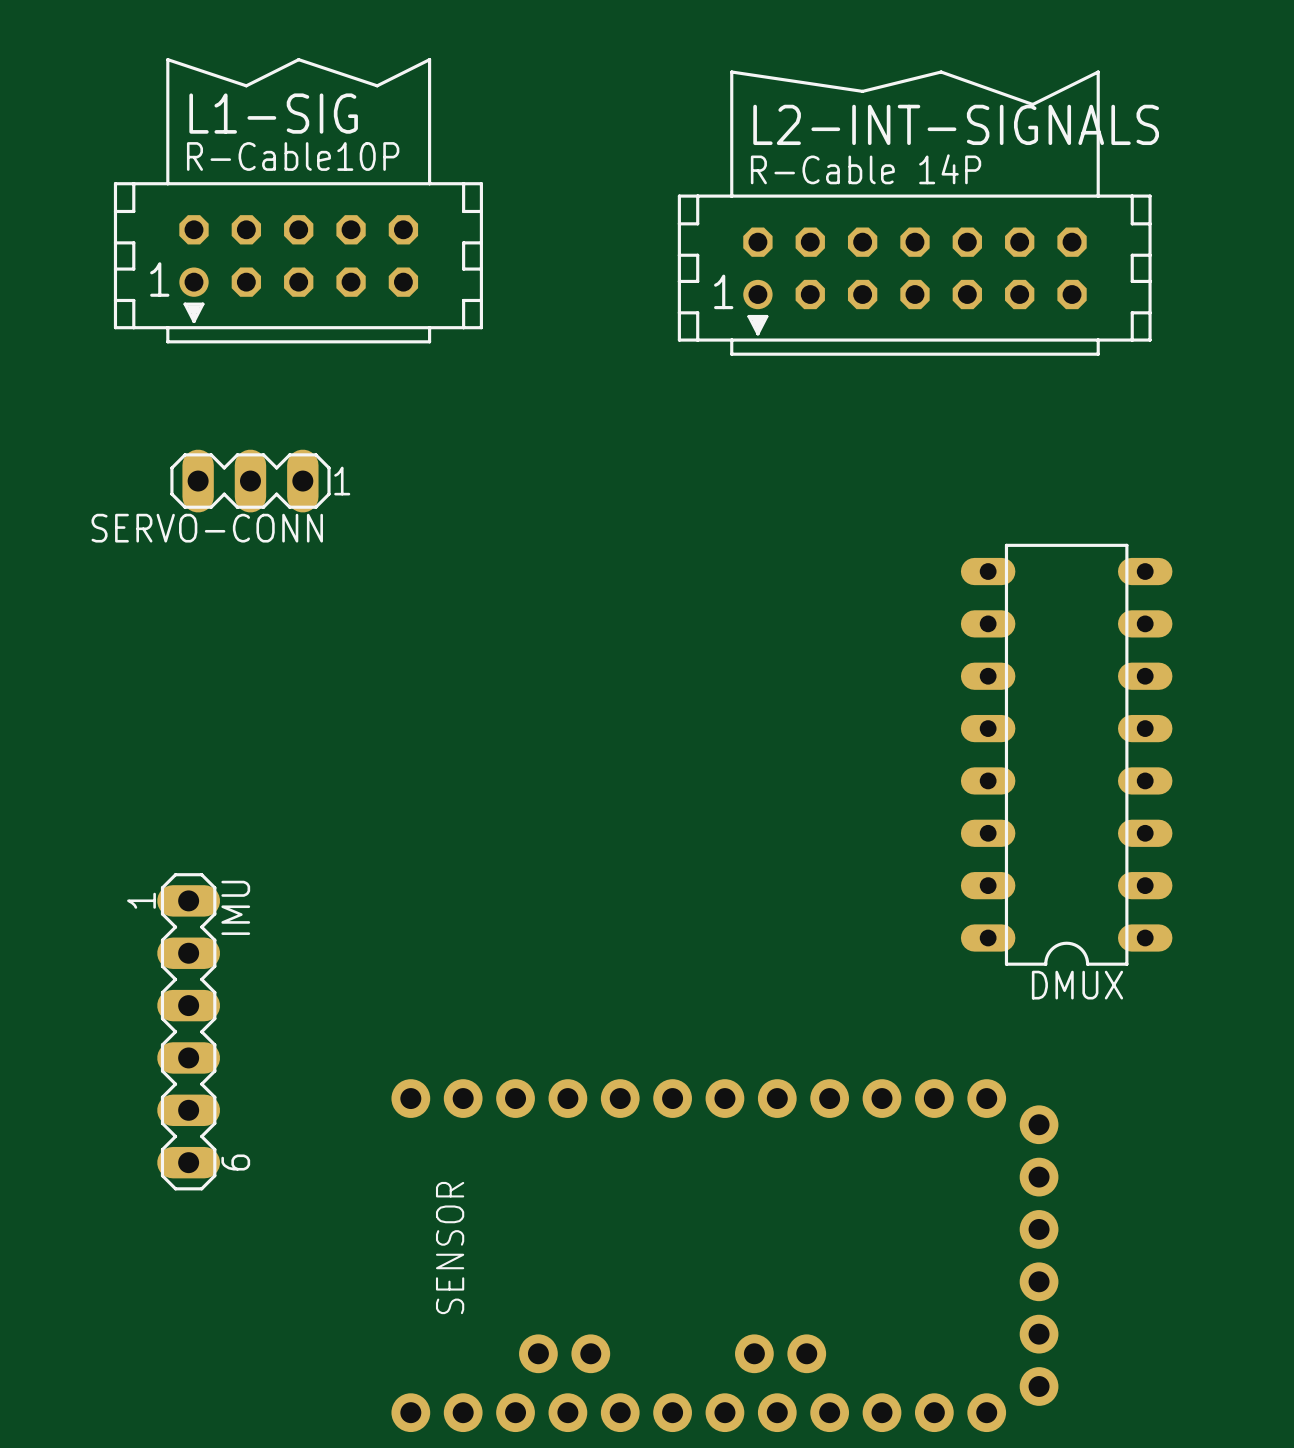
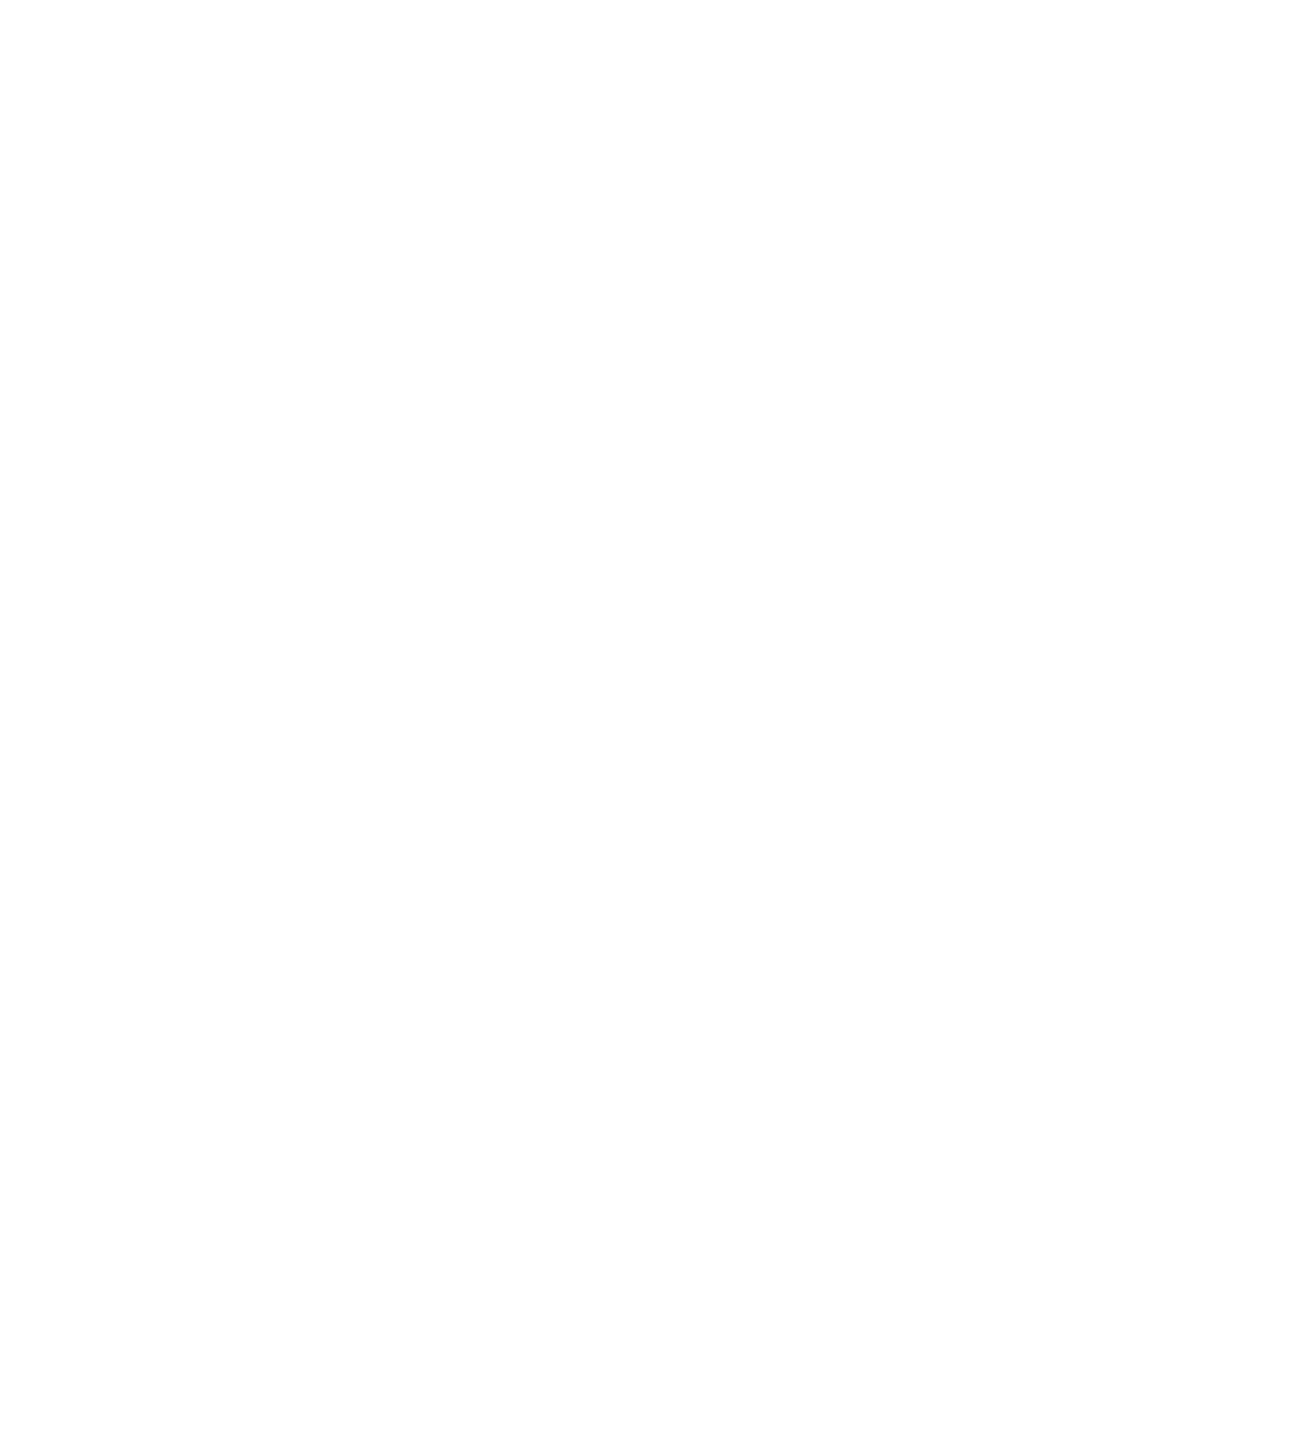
L1-SIG: (298, 200) -> none
L2-INT-SIGNALS: (914, 213) -> none
SERVO-CONN: (250, 481) -> none
DMUX: (1066, 754) -> none
IMU: (188, 1031) -> none
SENSOR: (724, 1255) -> none

